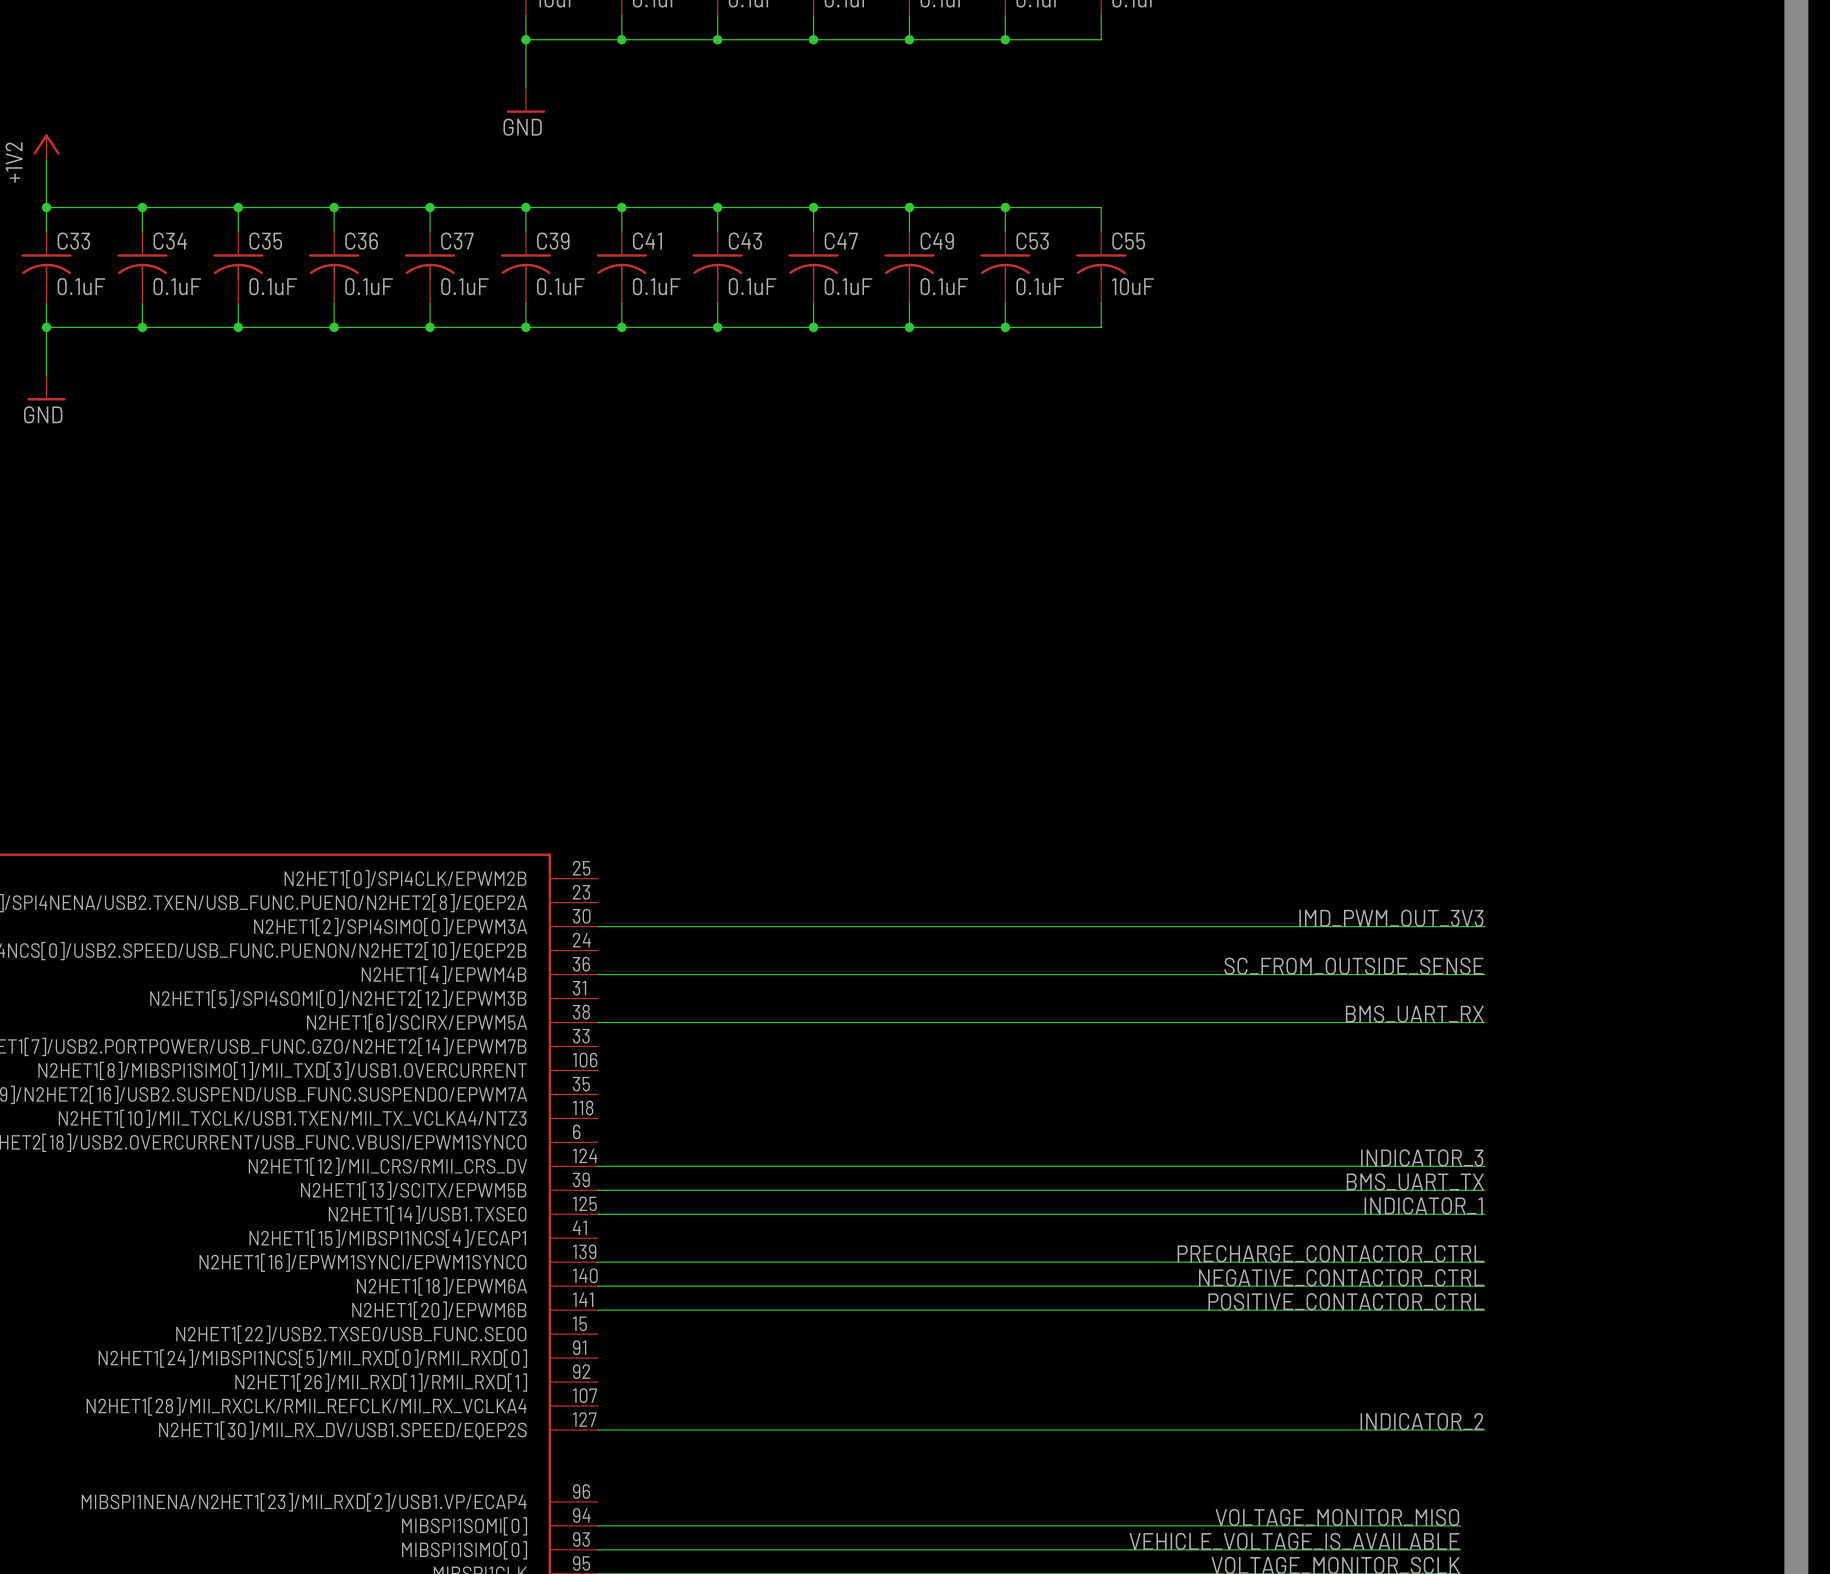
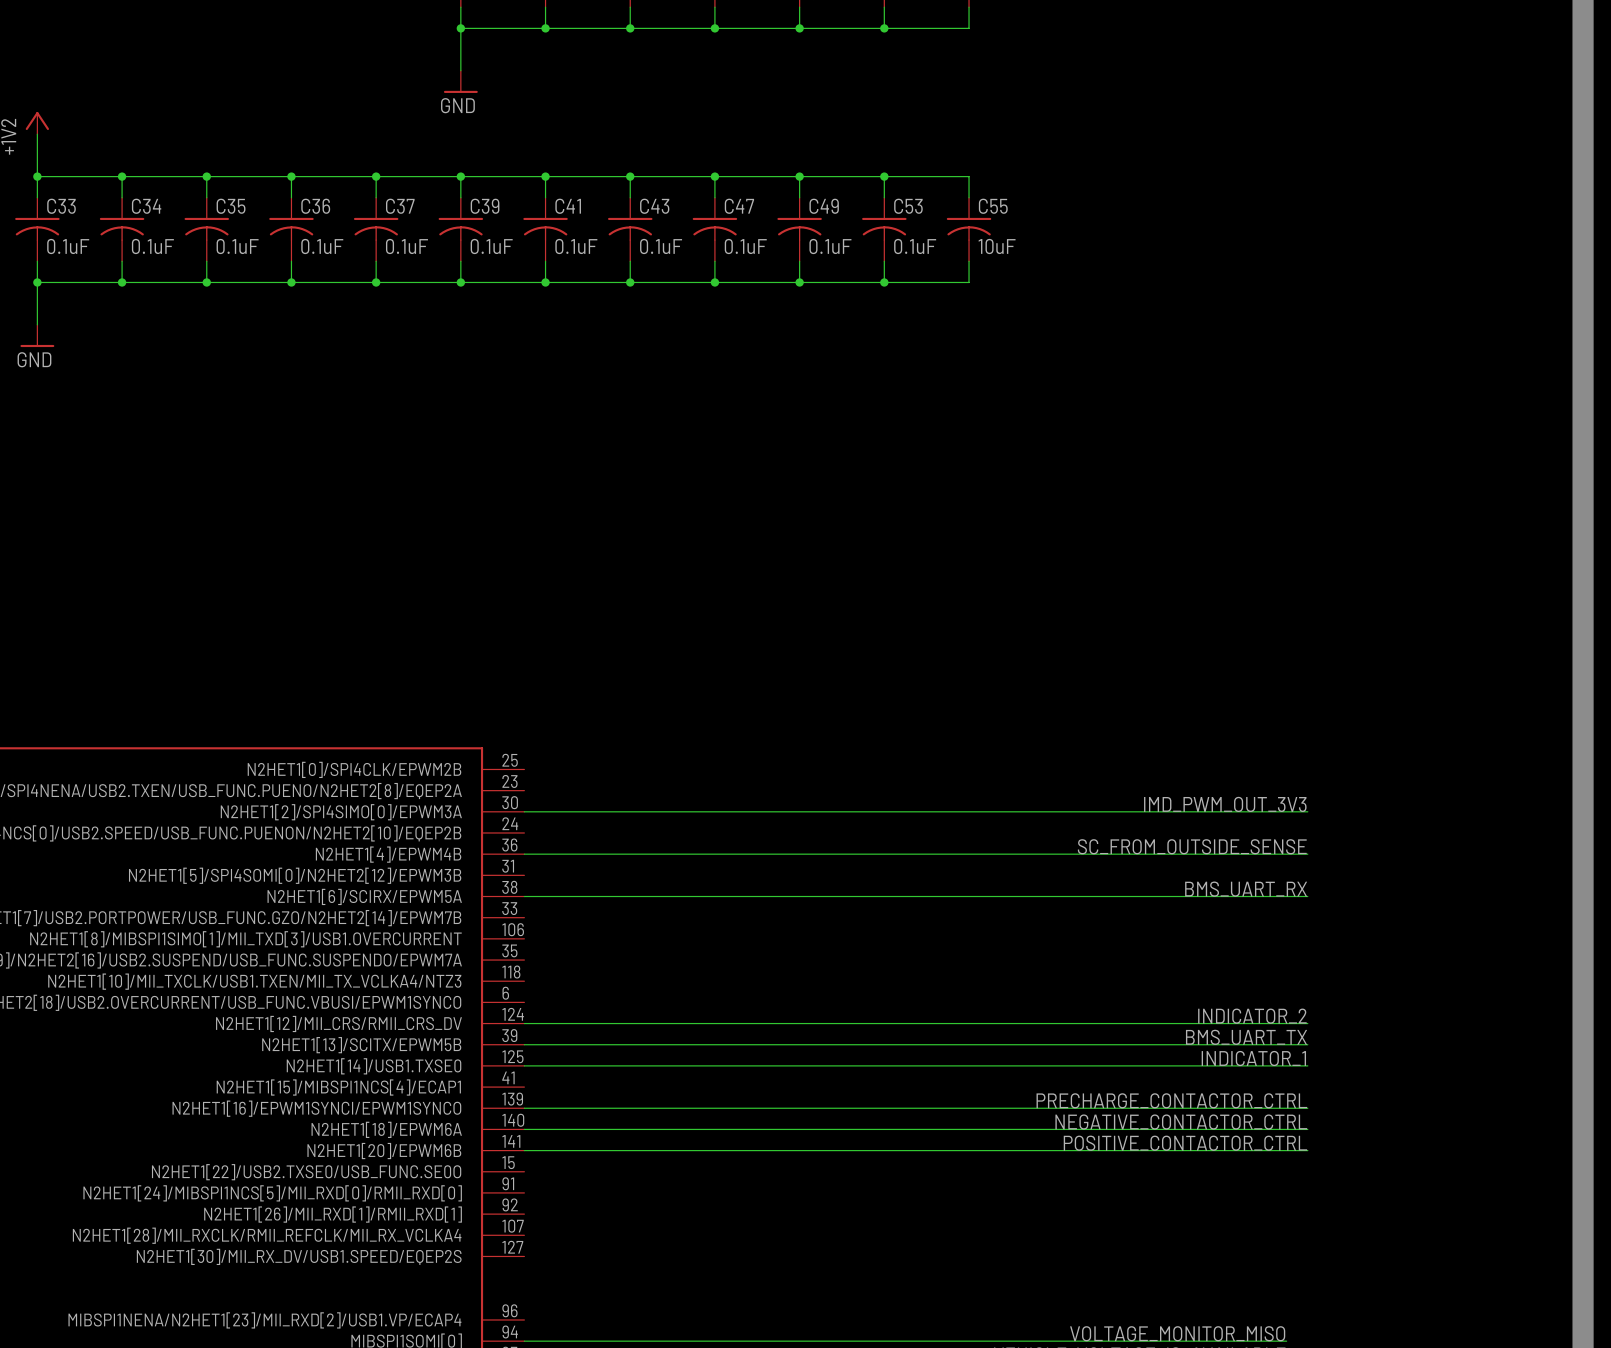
label: INDICATOR_3 (1422, 1157) -> INDICATOR_2 (1252, 1016)
label: INDICATOR_2 (1422, 1421) -> none
wire: (597, 1430) (1484, 1430) -> none

